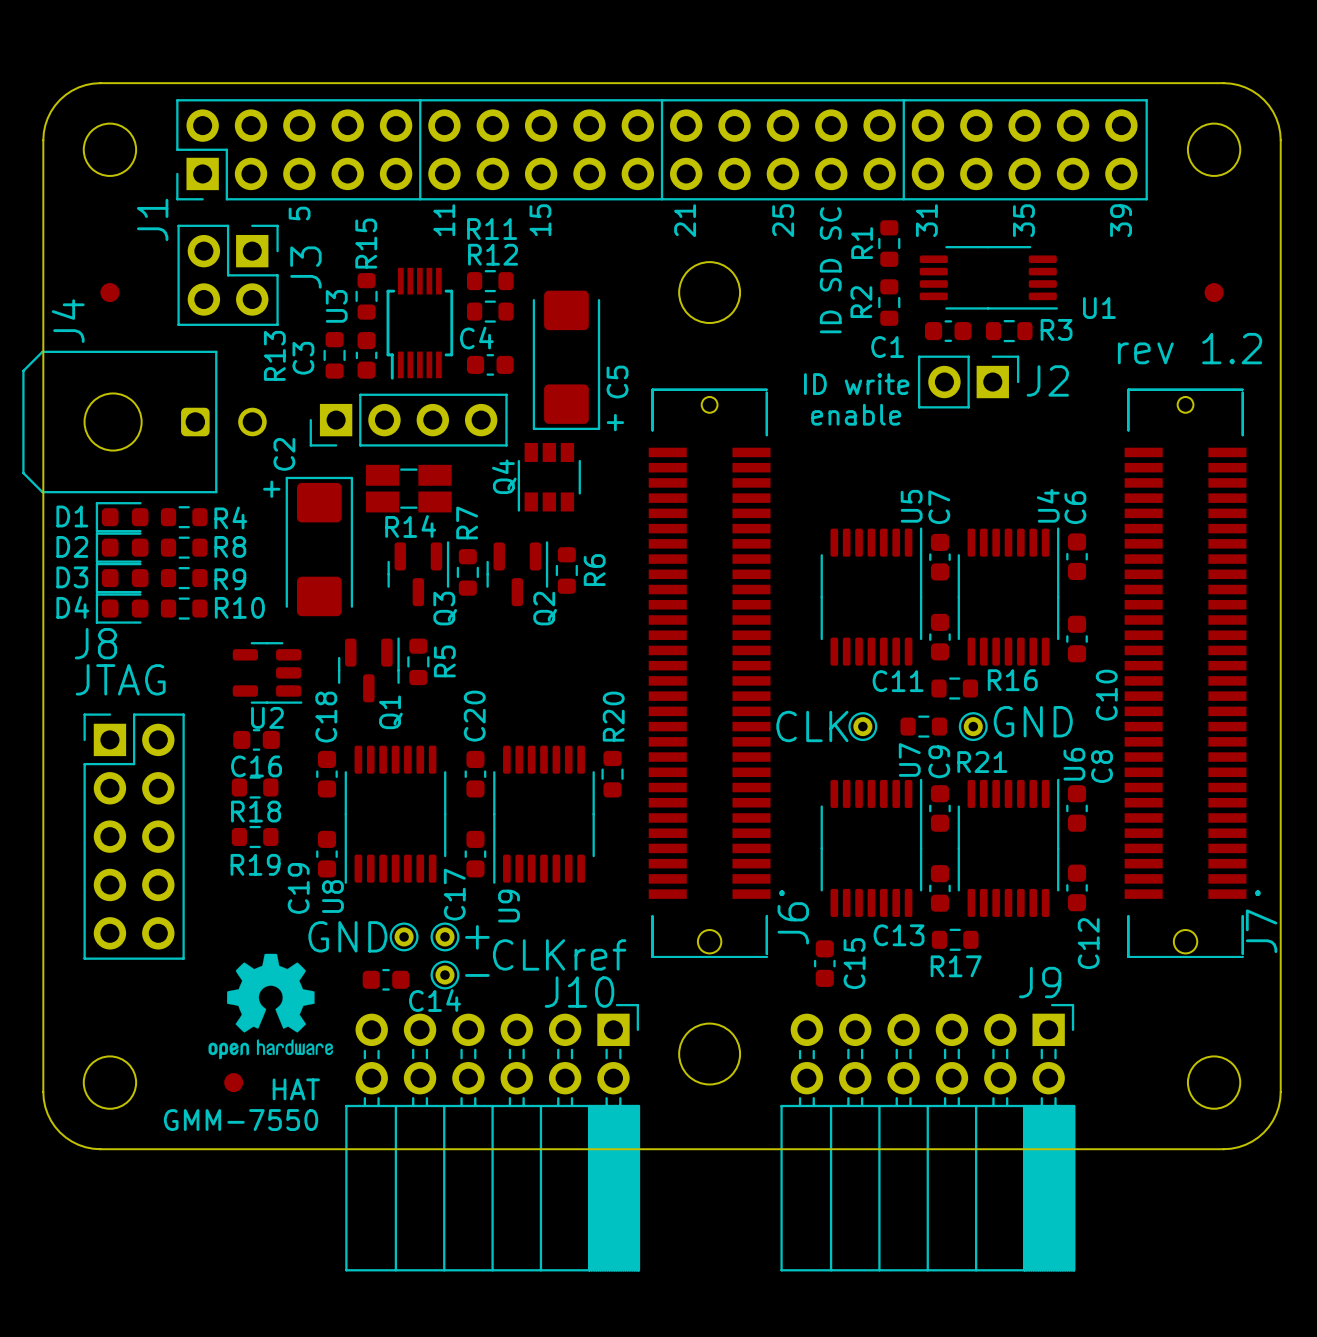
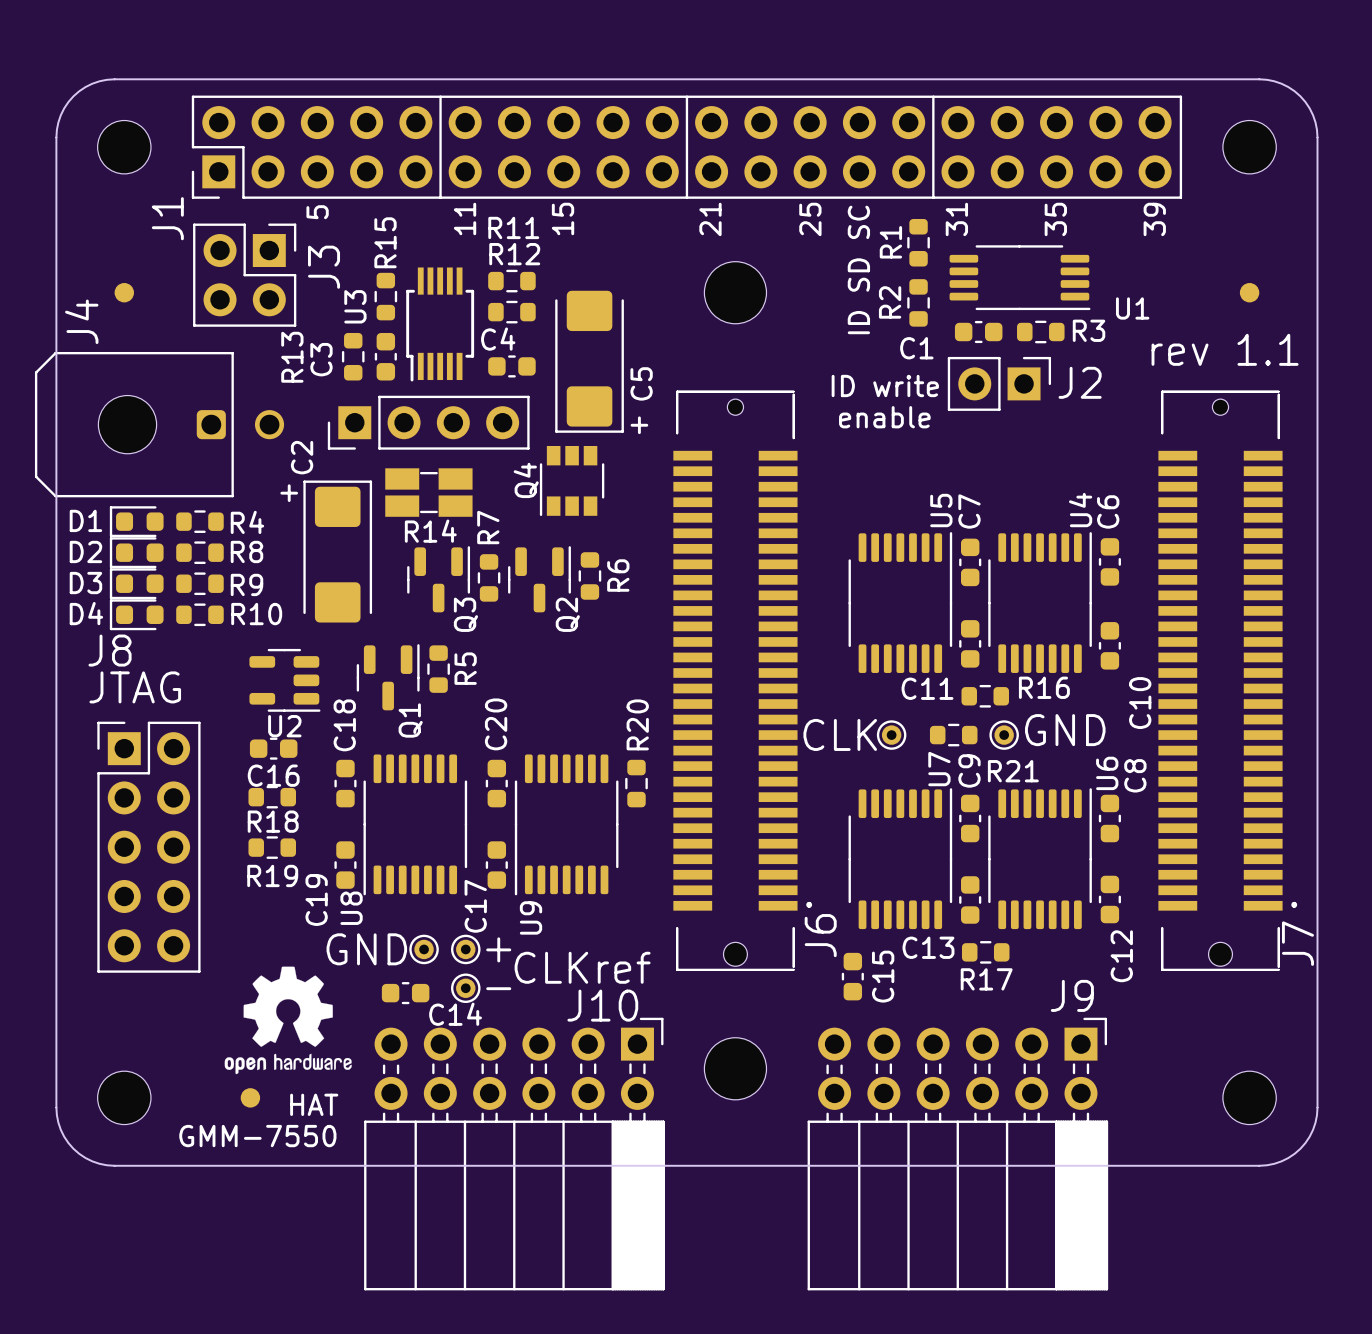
text: rev 1.2 (1190, 348) -> rev 1.1 (1225, 349)

